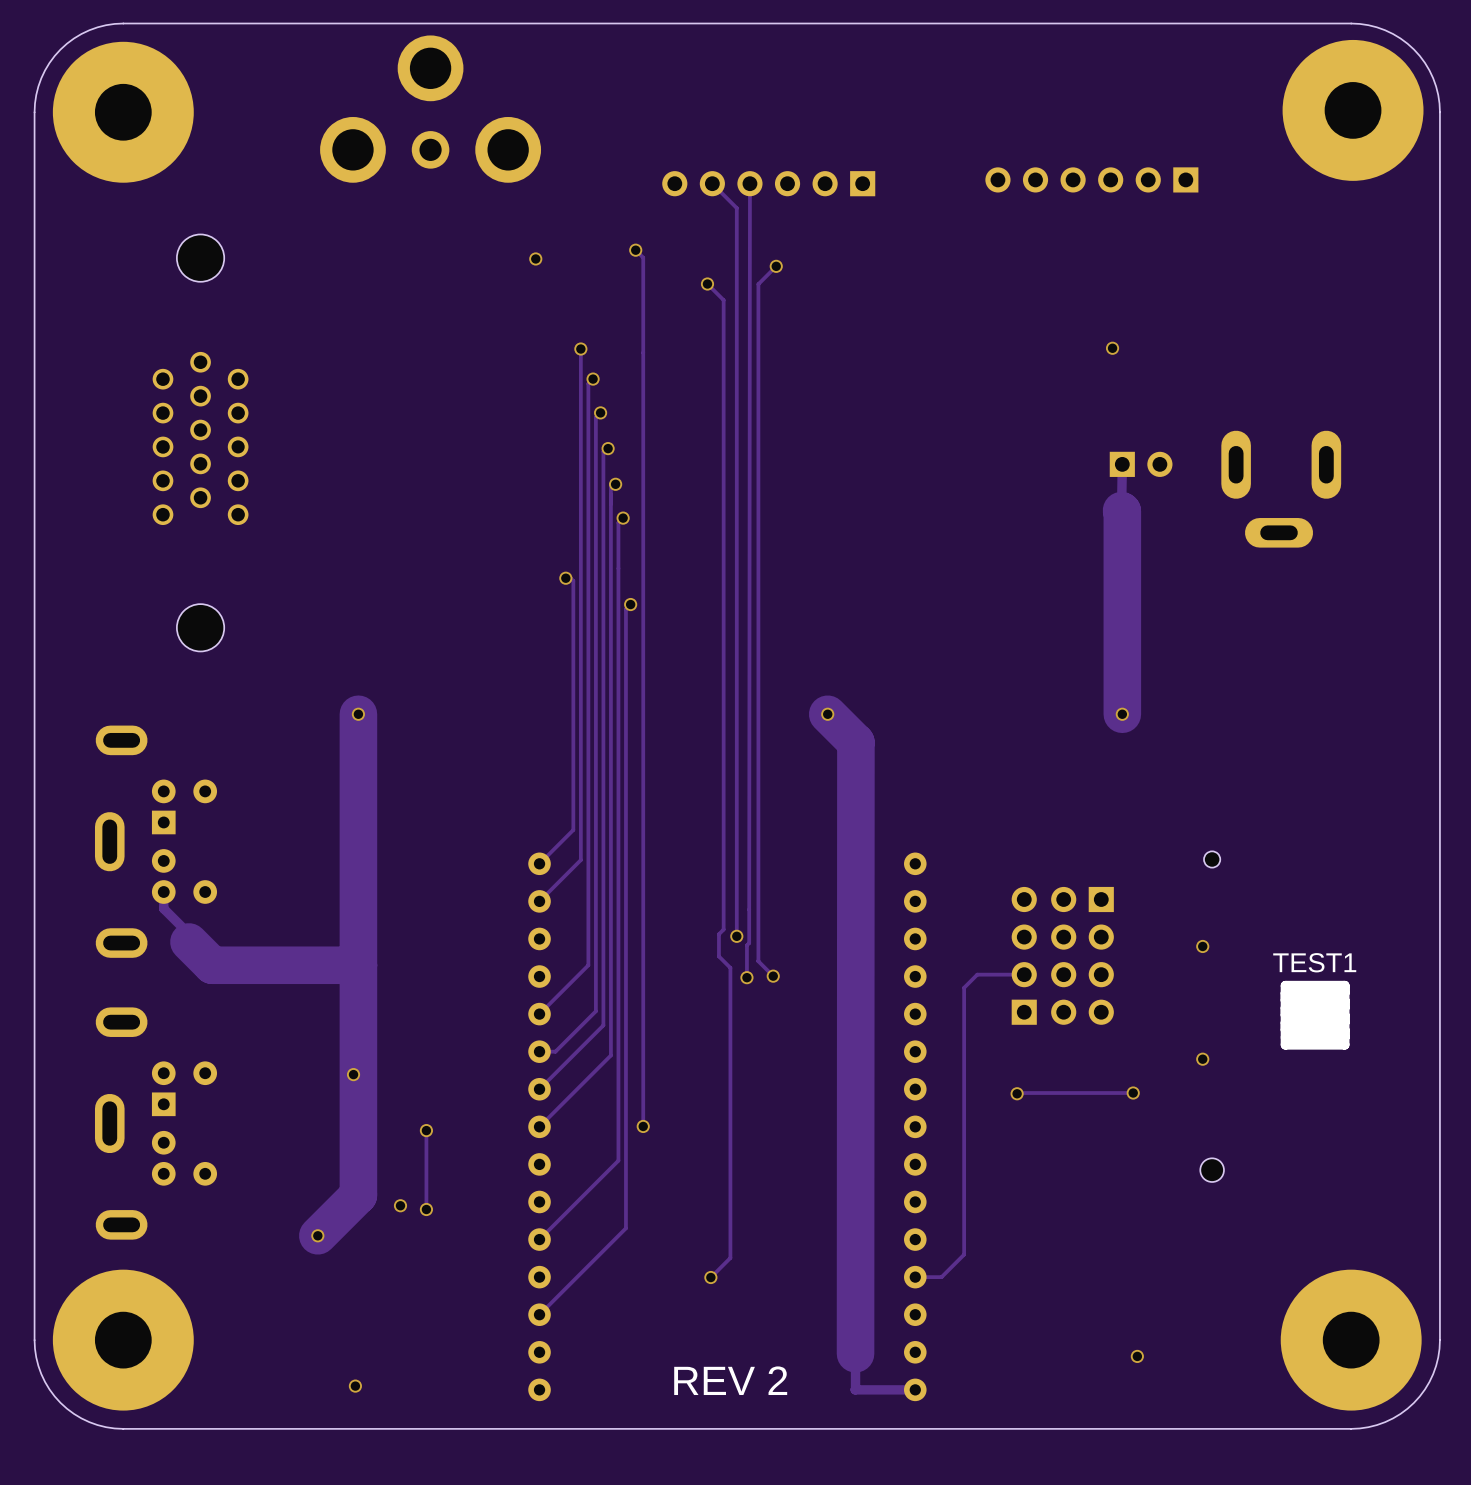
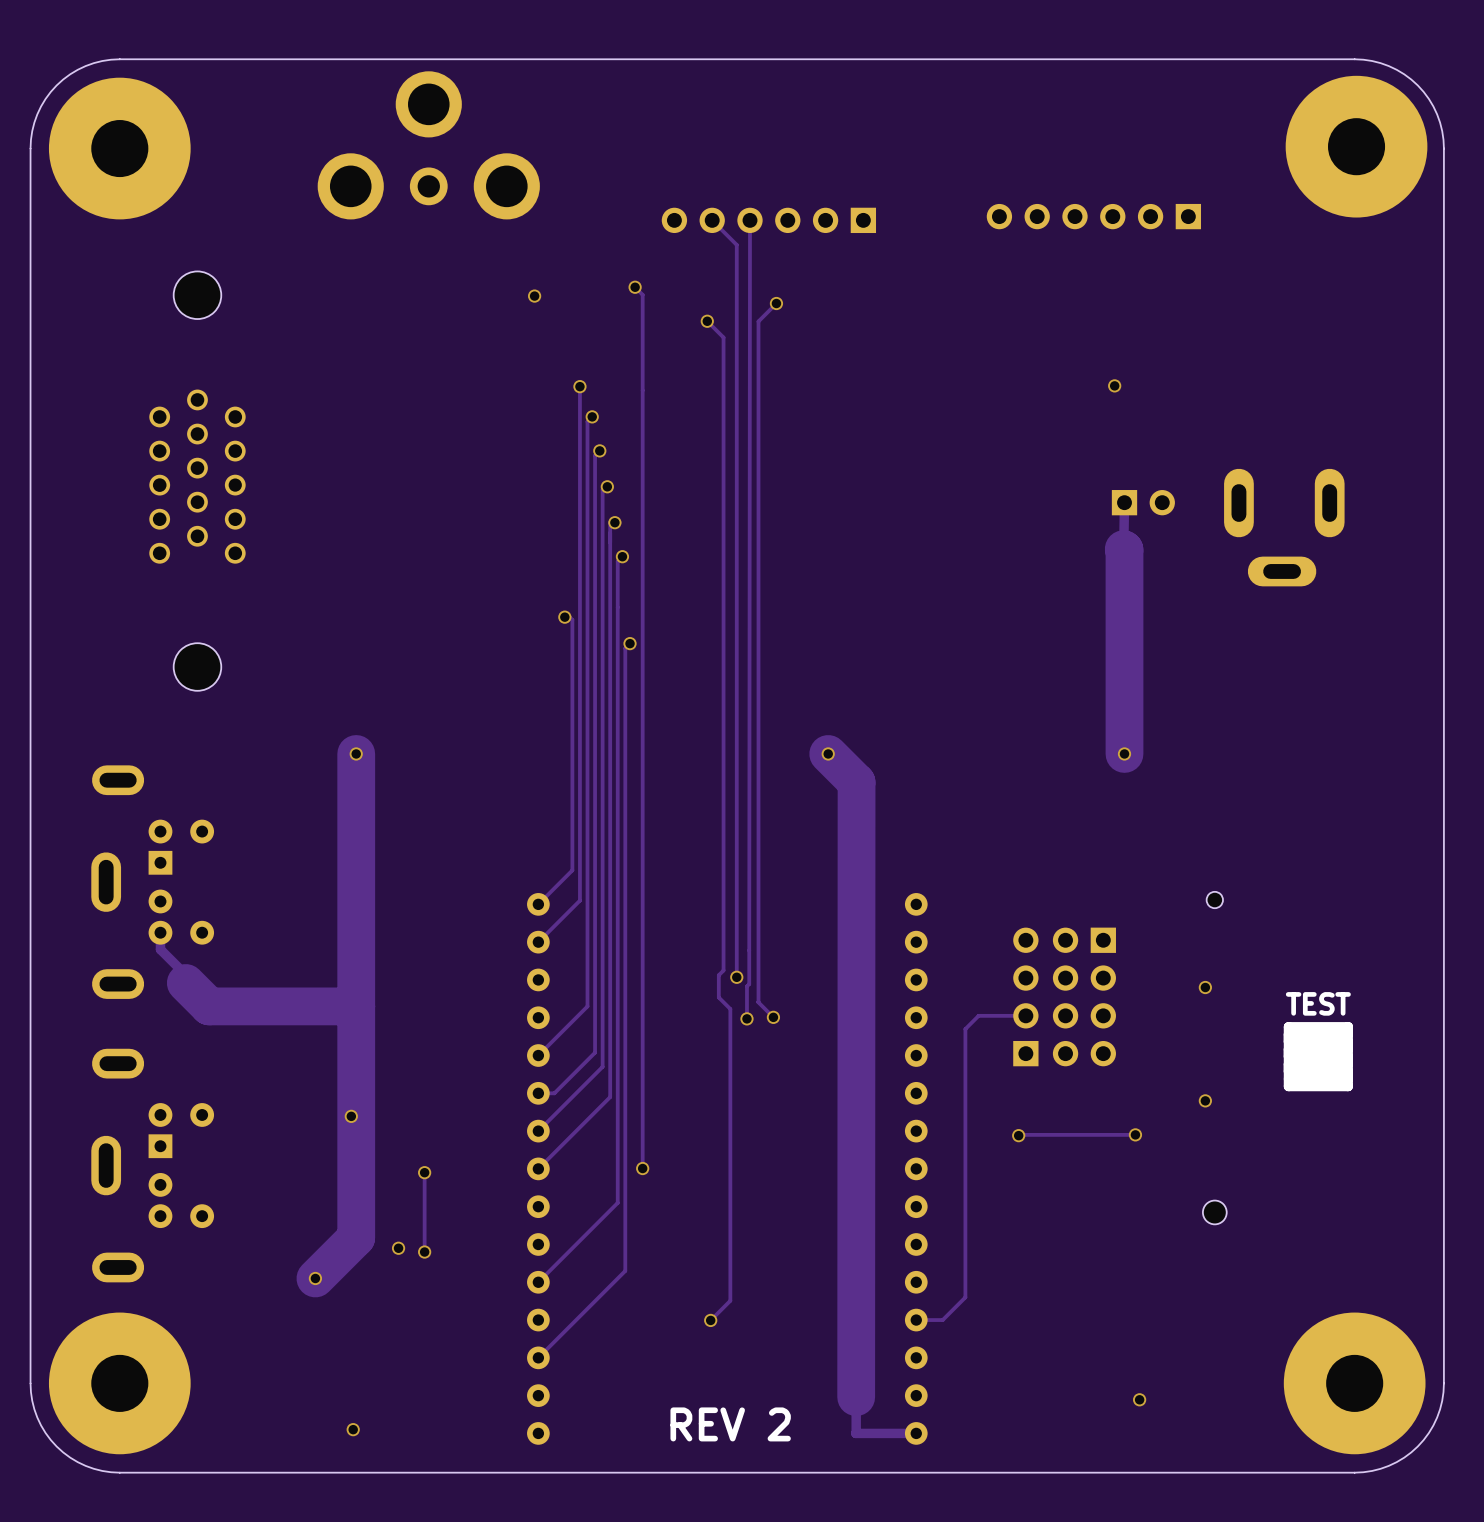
TEST1 name: TEST1 (1314, 962) -> TEST (1318, 1003)

